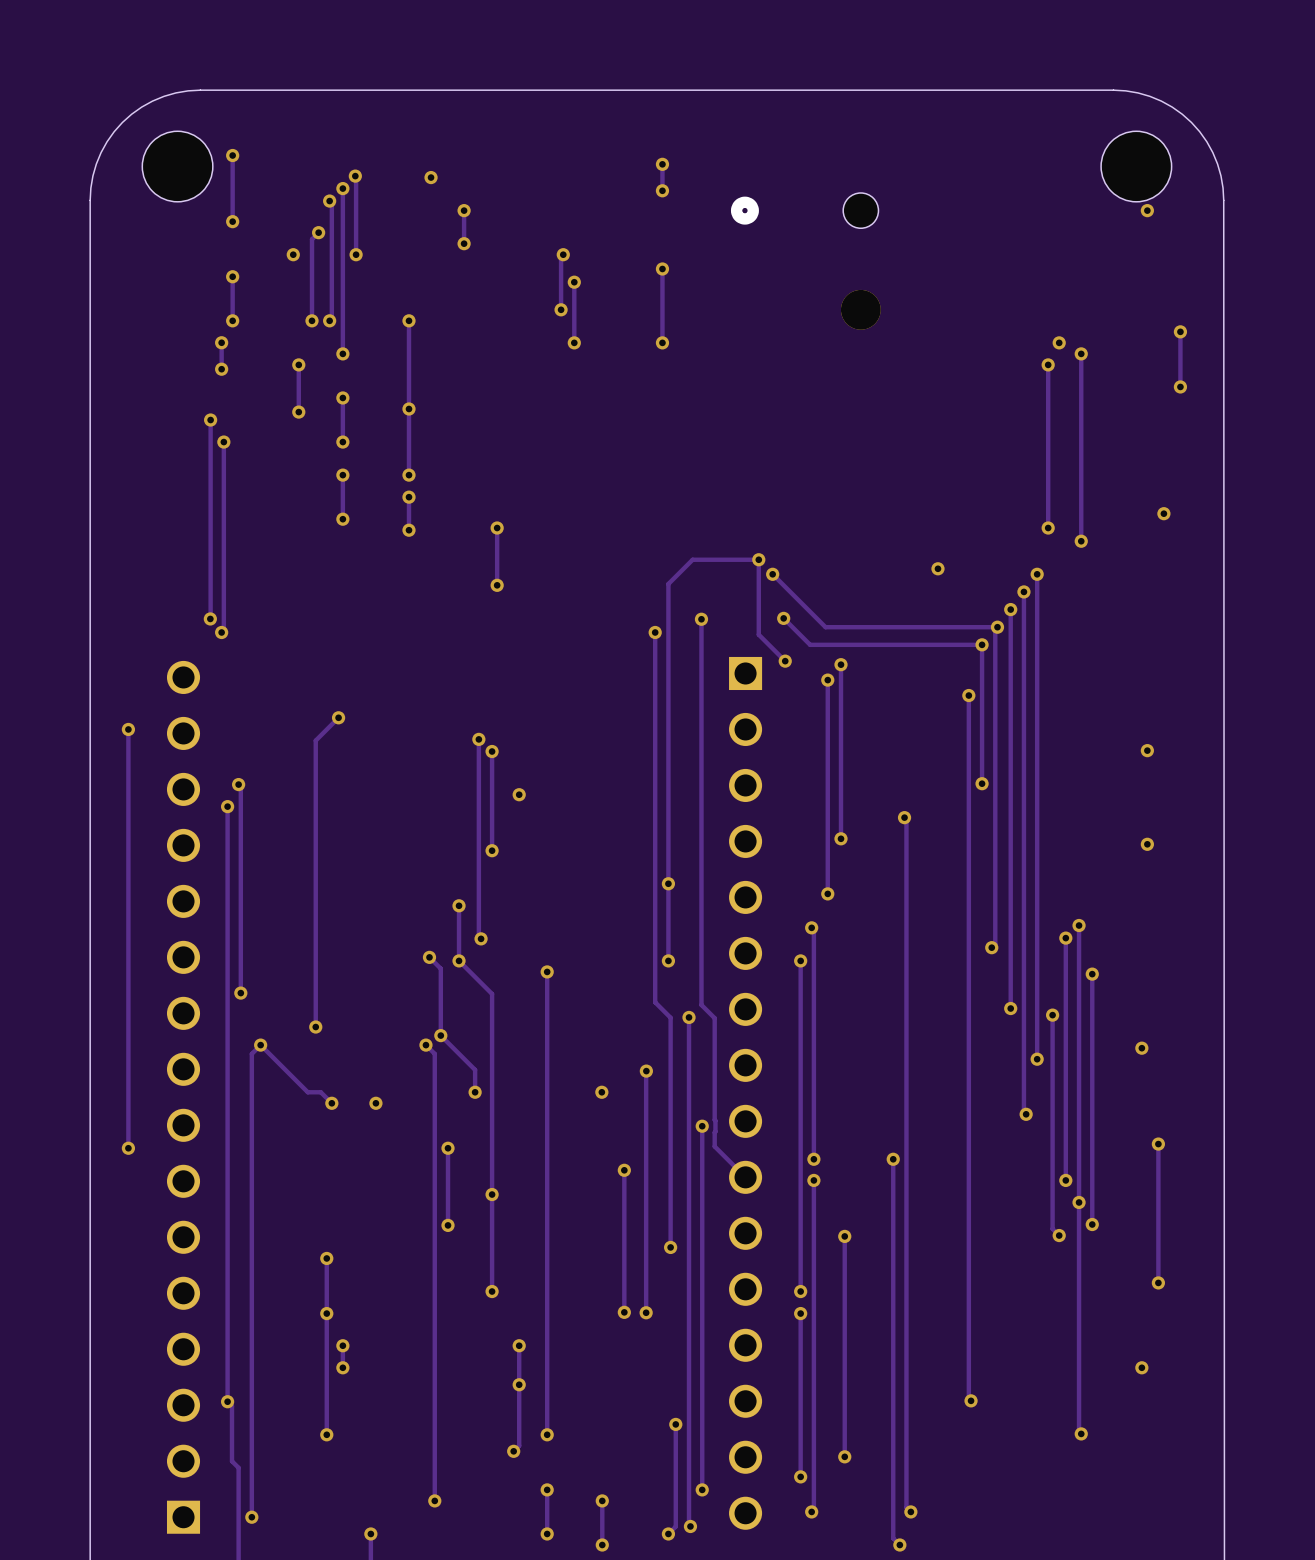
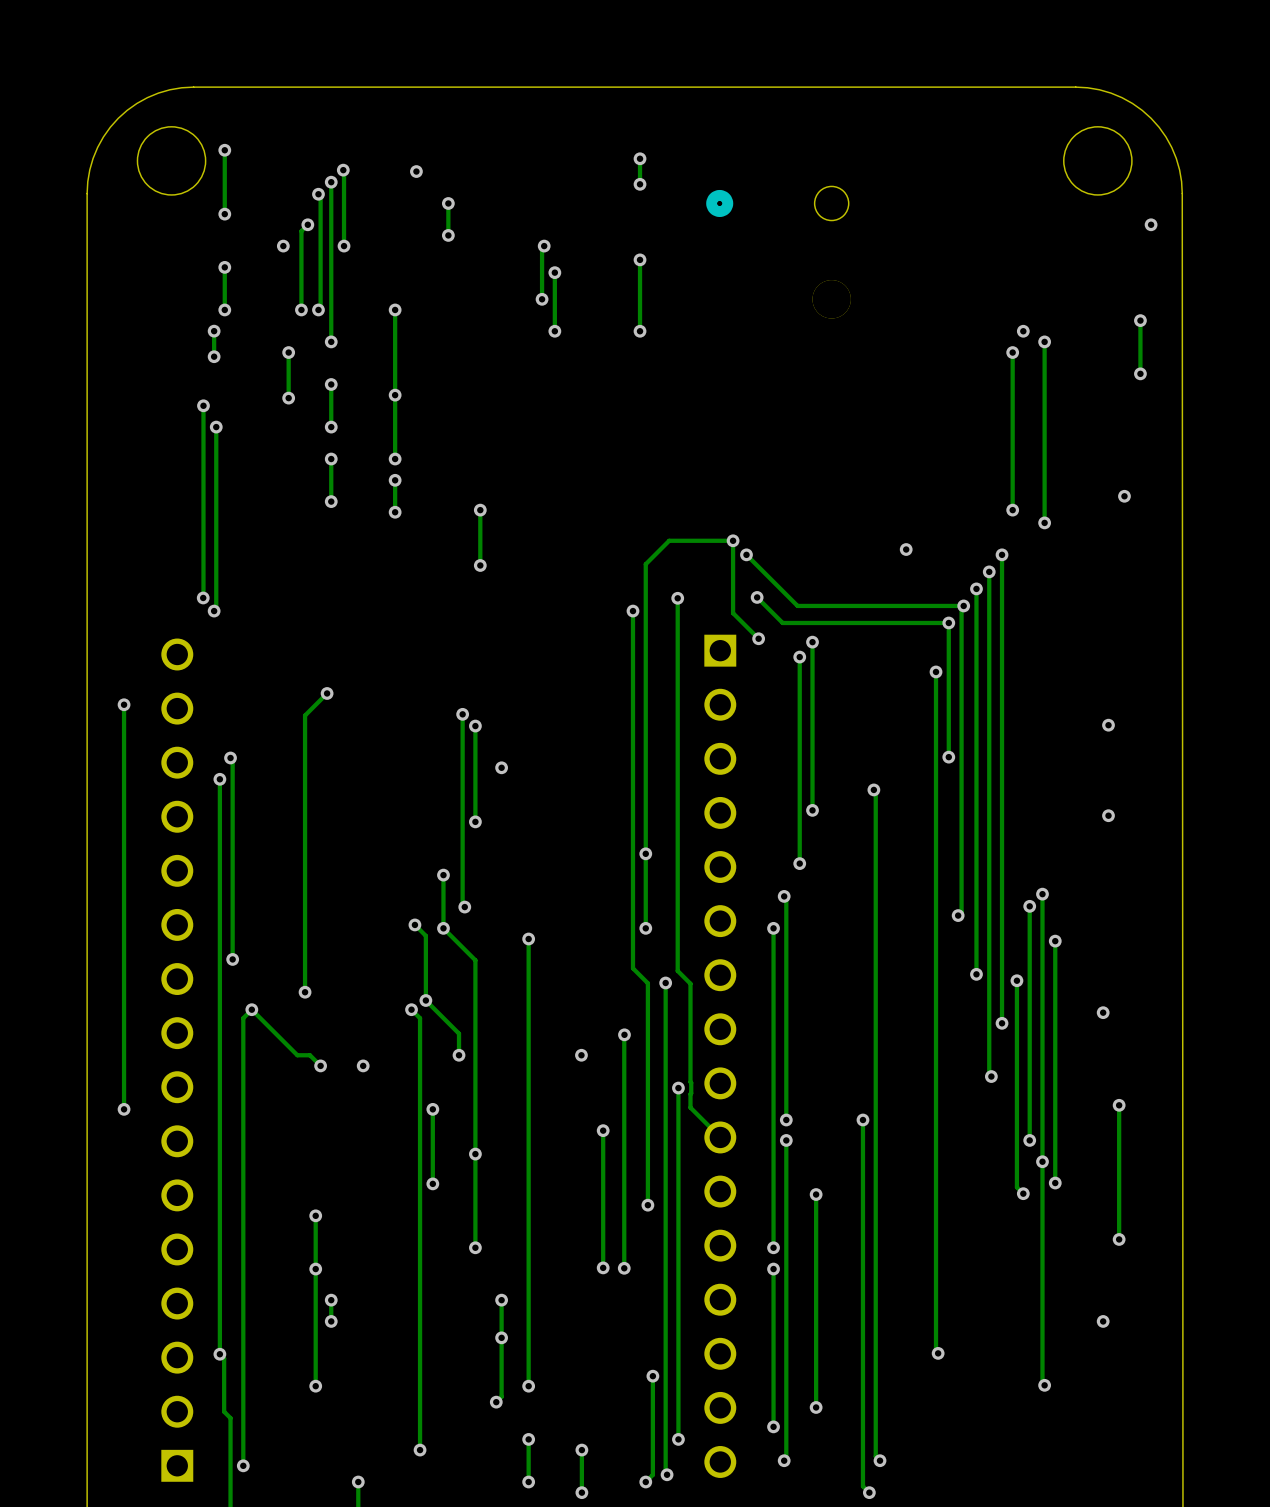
via position: (1147, 210) -> (1151, 224)

